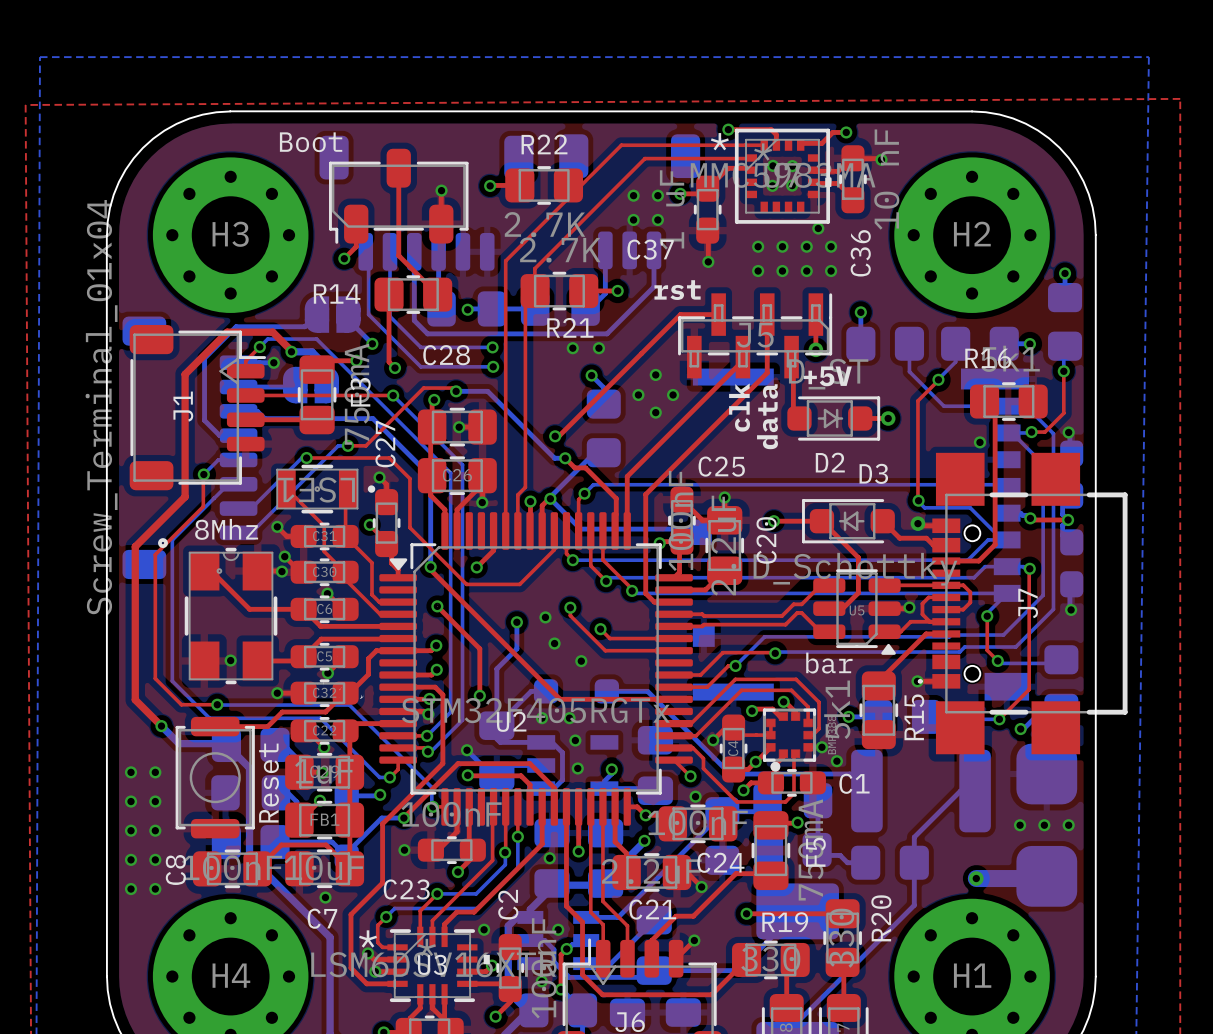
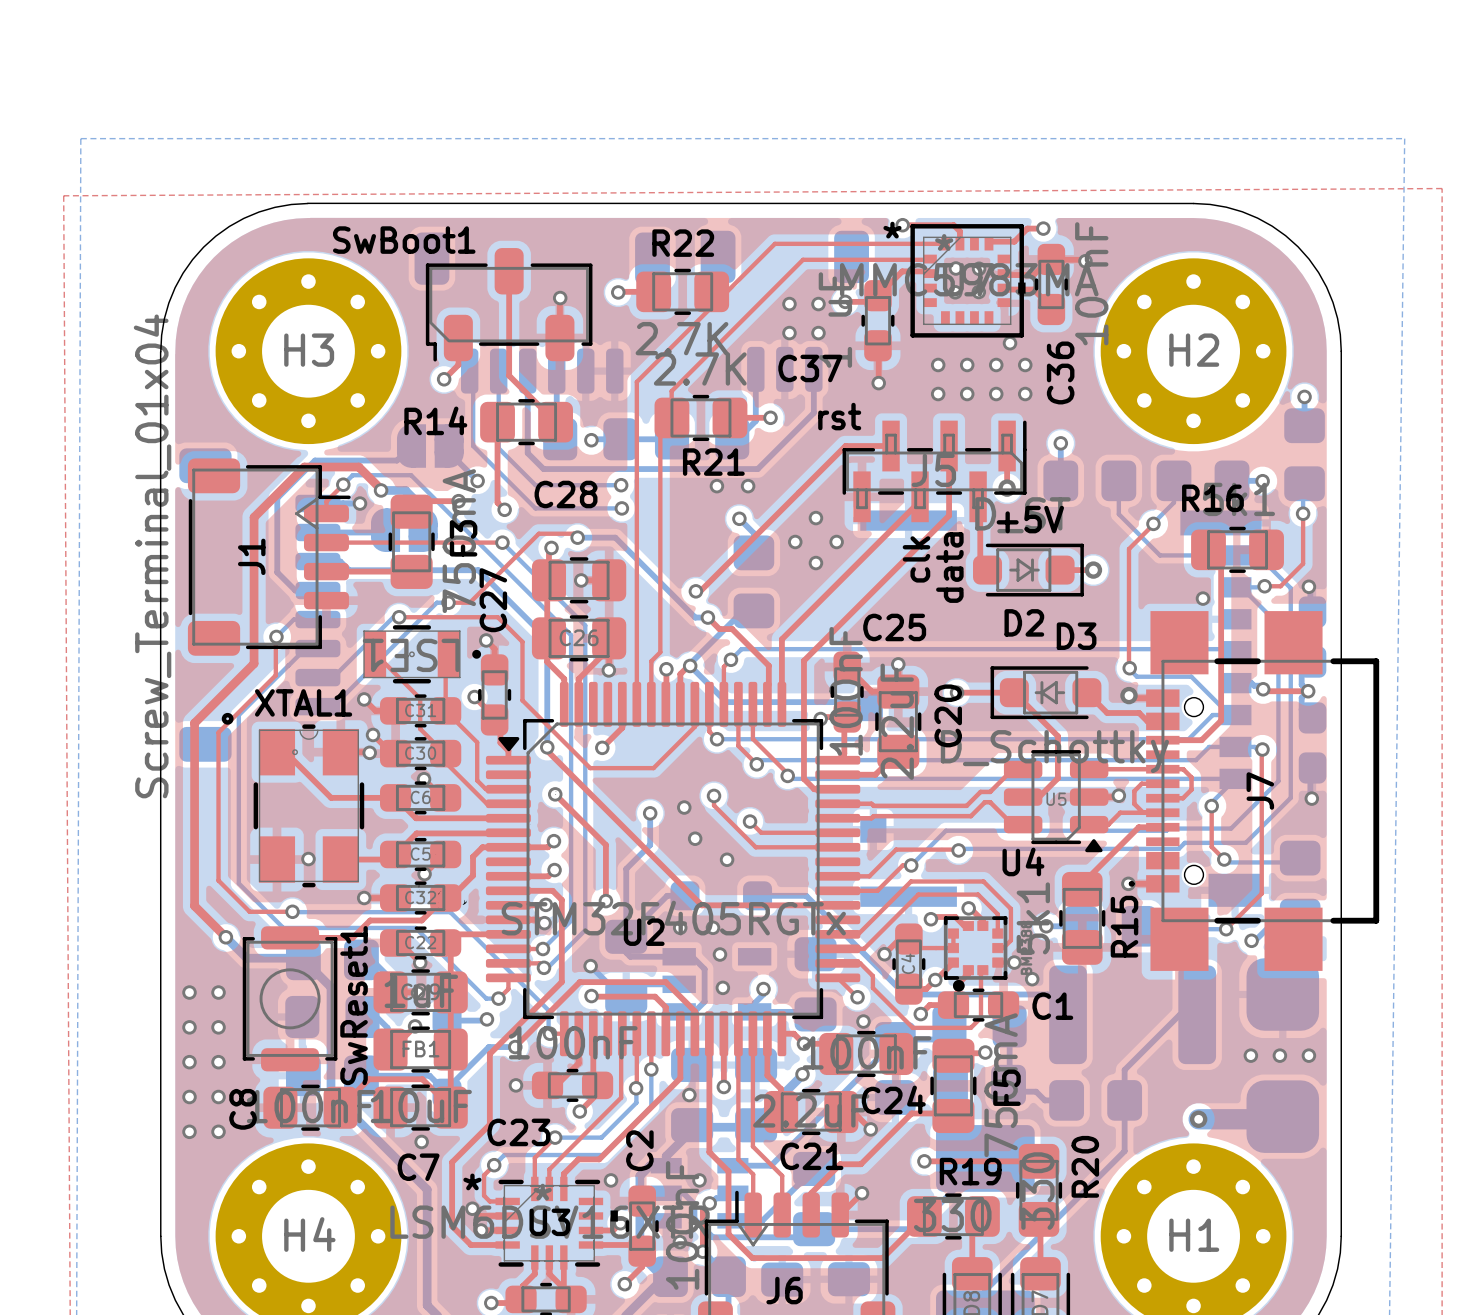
Boot name: Boot (311, 142) -> SwBoot1 (404, 240)
8Mhz name: 8Mhz (226, 529) -> XTAL1 (303, 702)
bar name: bar (829, 663) -> U4 (1023, 861)
Reset name: Reset (269, 783) -> SwReset1 (354, 1005)

